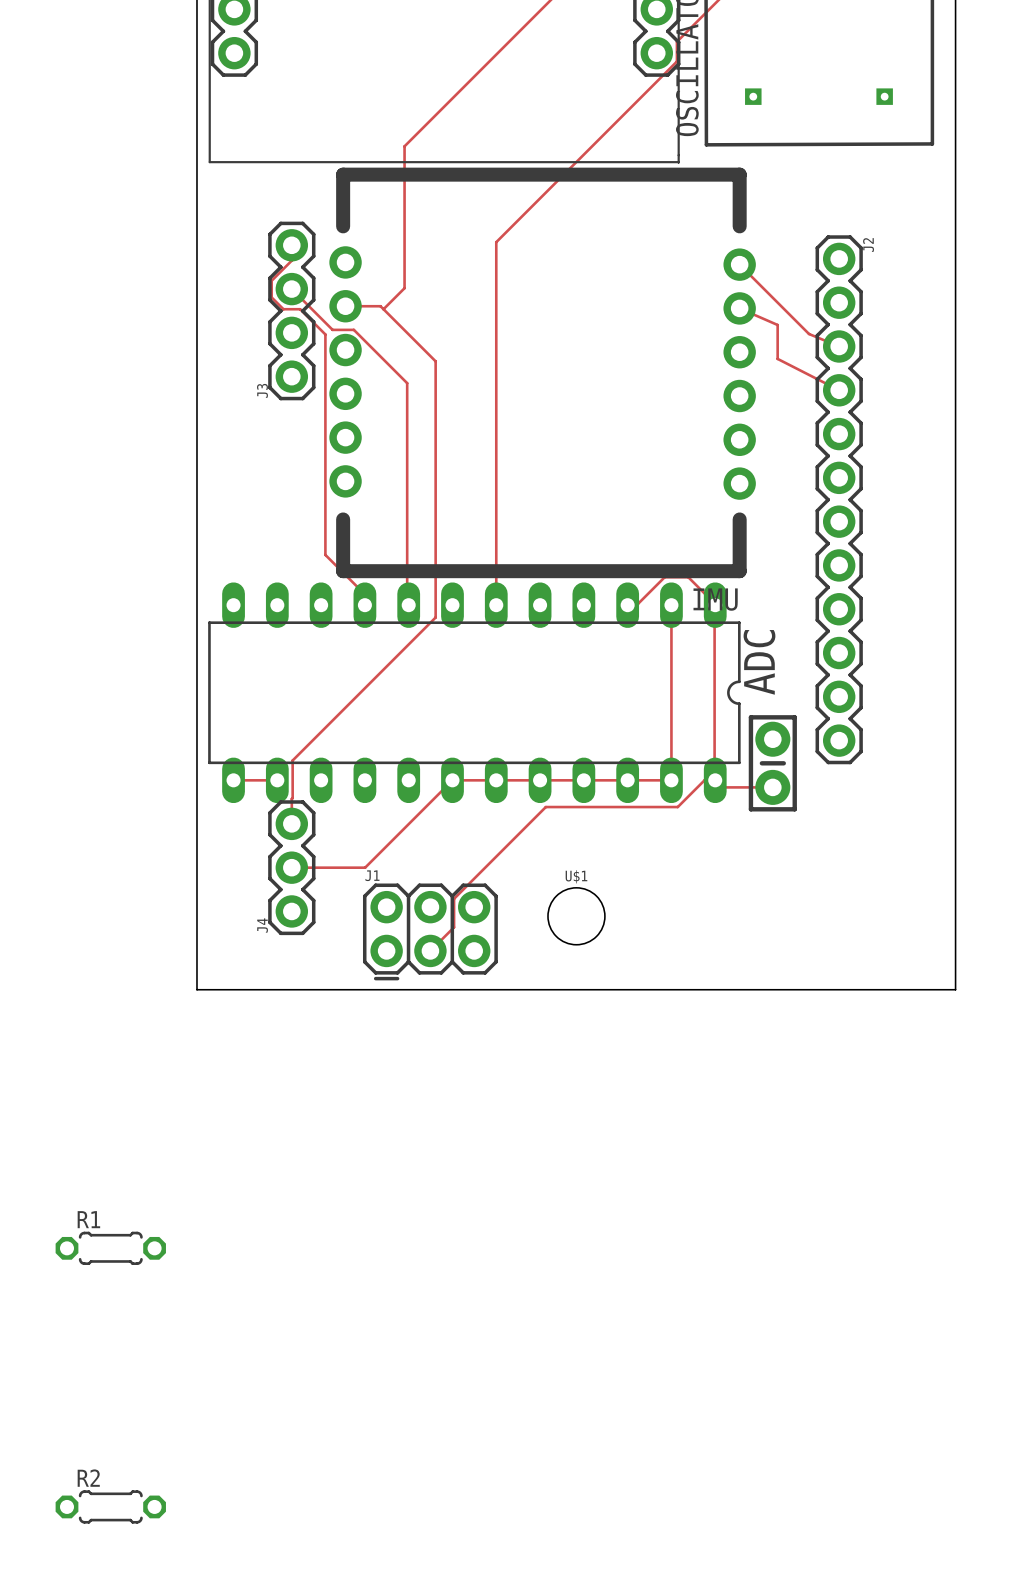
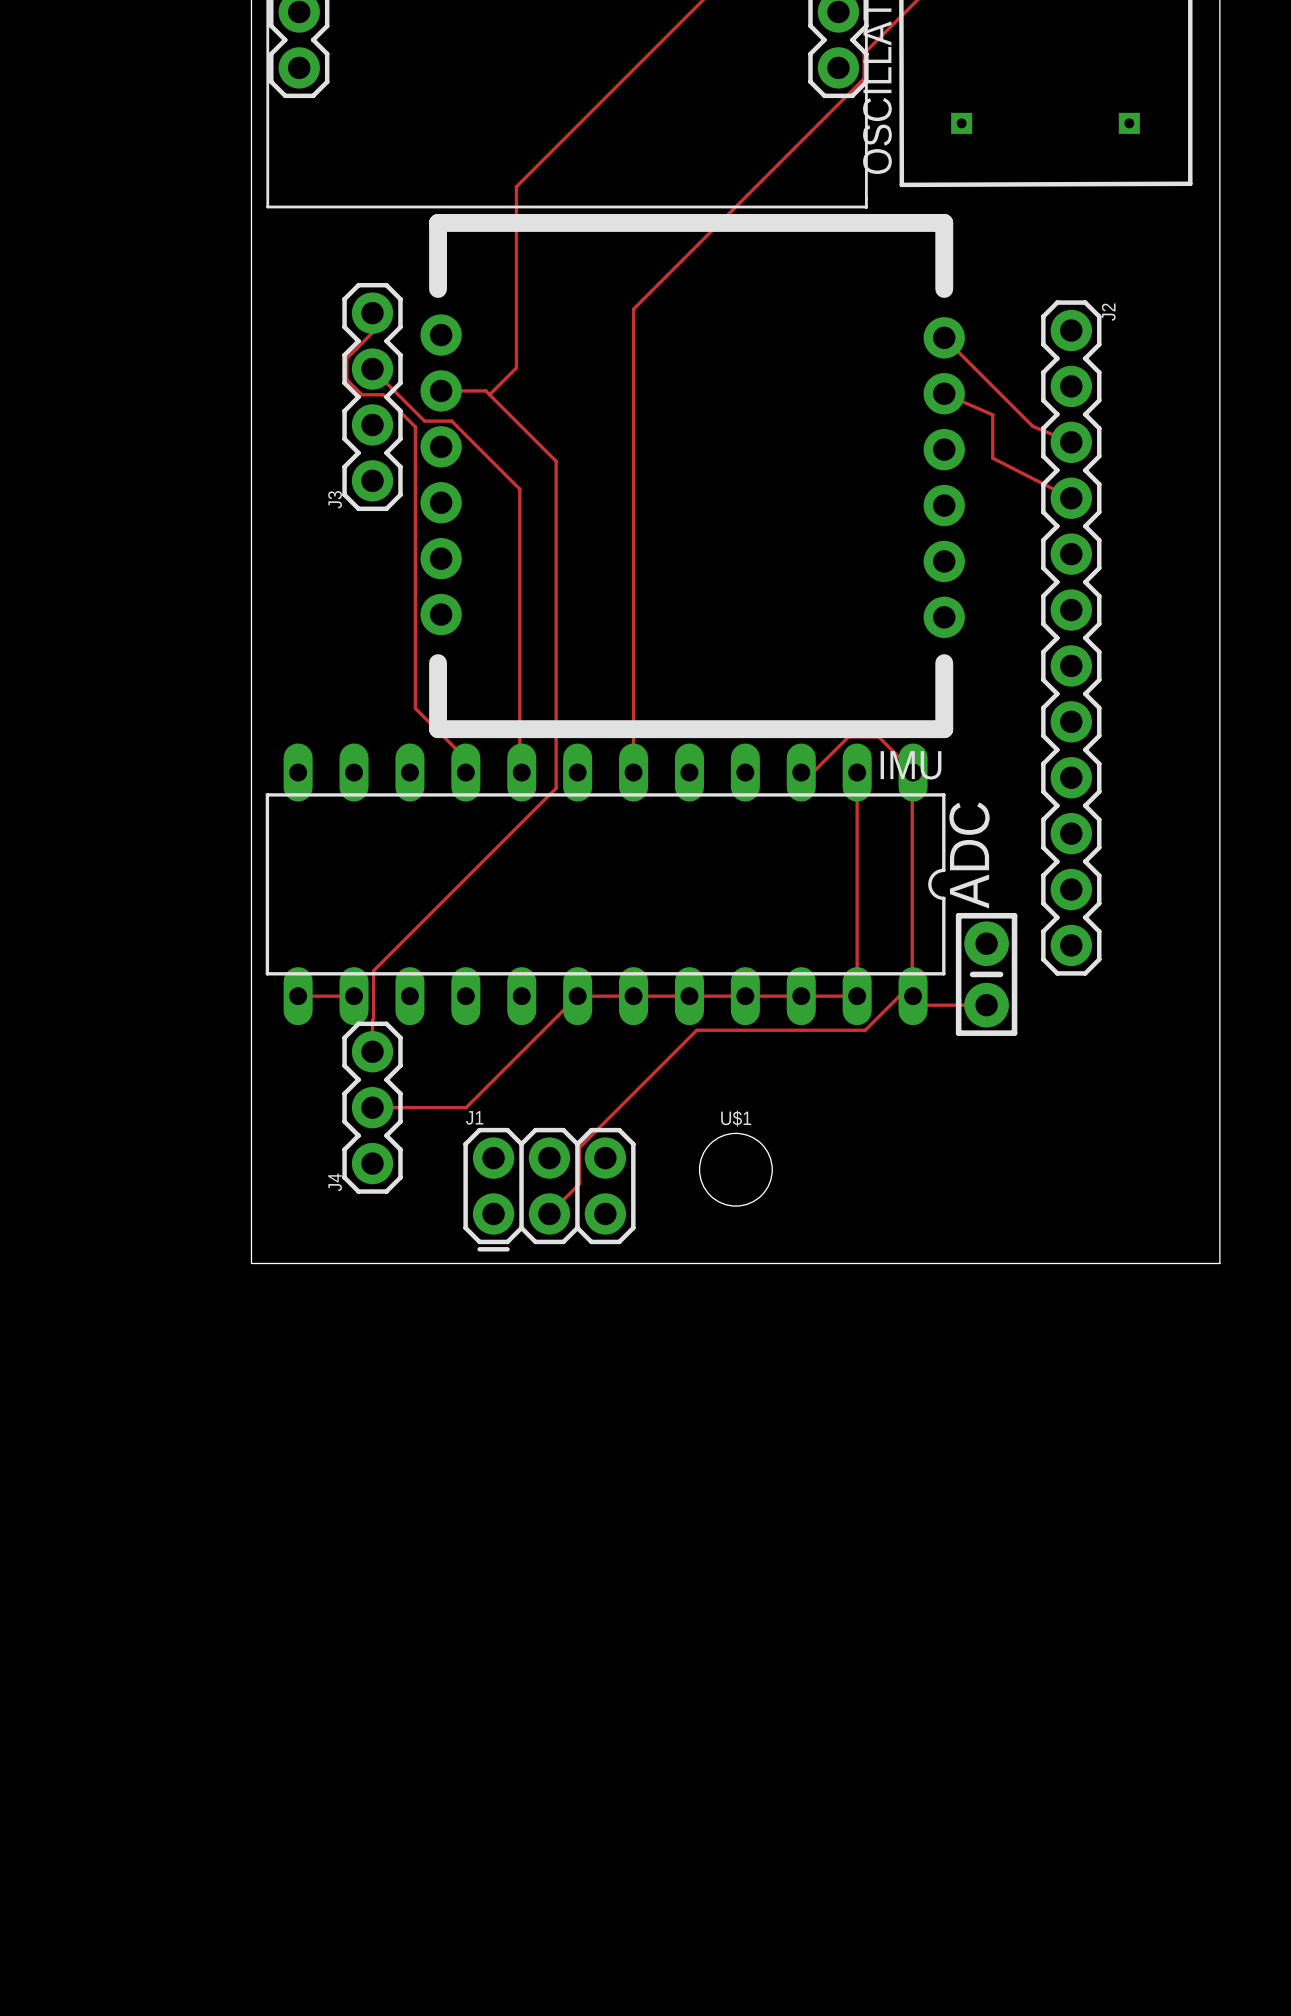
R1: (110, 1248) -> none
R2: (110, 1506) -> none

